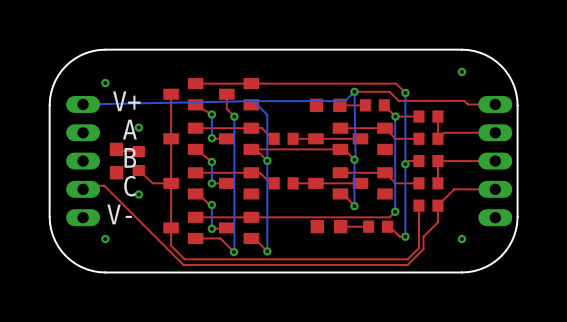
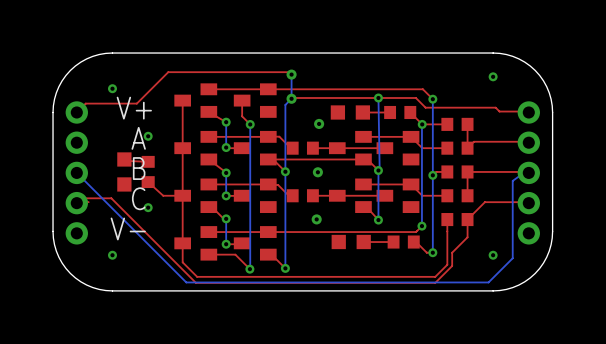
top track: none -> (291, 74) (291, 72) (168, 72) (136, 103) (85, 103) (76, 112)
via: none -> (291, 74)
top track: none -> (378, 98) (291, 98)
bottom track: (354, 91) (345, 101) (253, 101) -> none
via: none -> (291, 98)
part footprint: [478, 95, 513, 227] -> [517, 101, 540, 245]
bottom track: (253, 101) (267, 114) -> (291, 74) (291, 98) (285, 104) (285, 122)
bottom track: (253, 101) (83, 104) -> none
via: none -> (319, 123)
part: none -> (76, 172)
part: (83, 161) -> none
via: none -> (317, 172)
bottom track: none -> (528, 172) (524, 172) (512, 180) (512, 258) (488, 282) (186, 282) (76, 172)
via: none -> (316, 219)

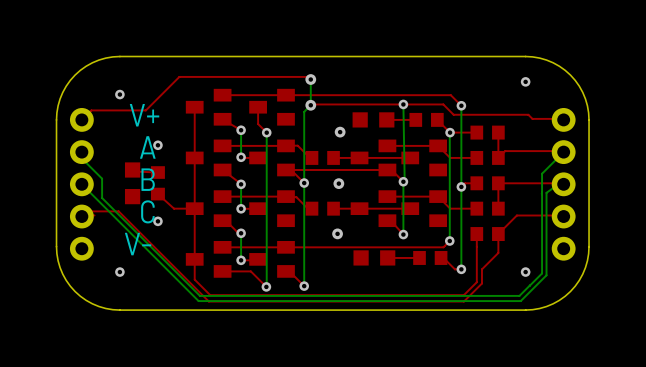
bottom track: none -> (81, 152) (81, 158) (102, 178) (102, 198) (200, 295) (519, 295) (529, 285)
bottom track: none -> (563, 152) (542, 173) (542, 273) (529, 285)

